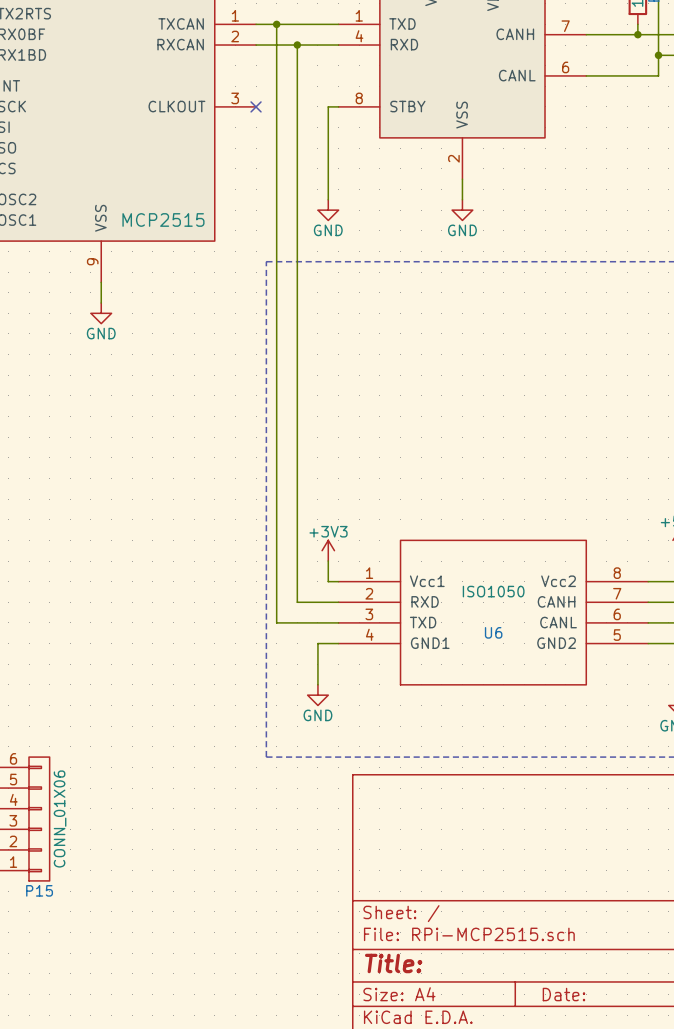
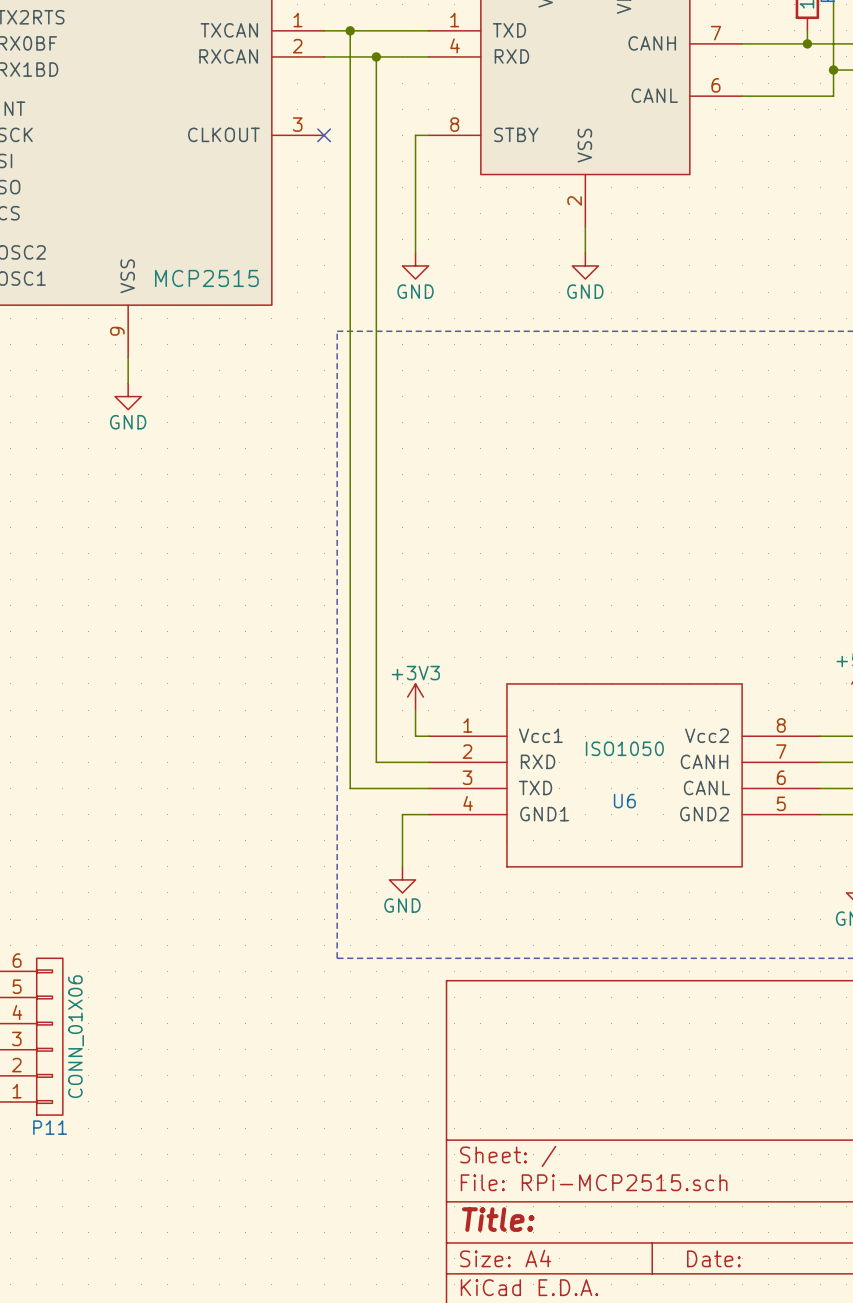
P15 name: P15 (39, 890) -> P11 (50, 1127)

